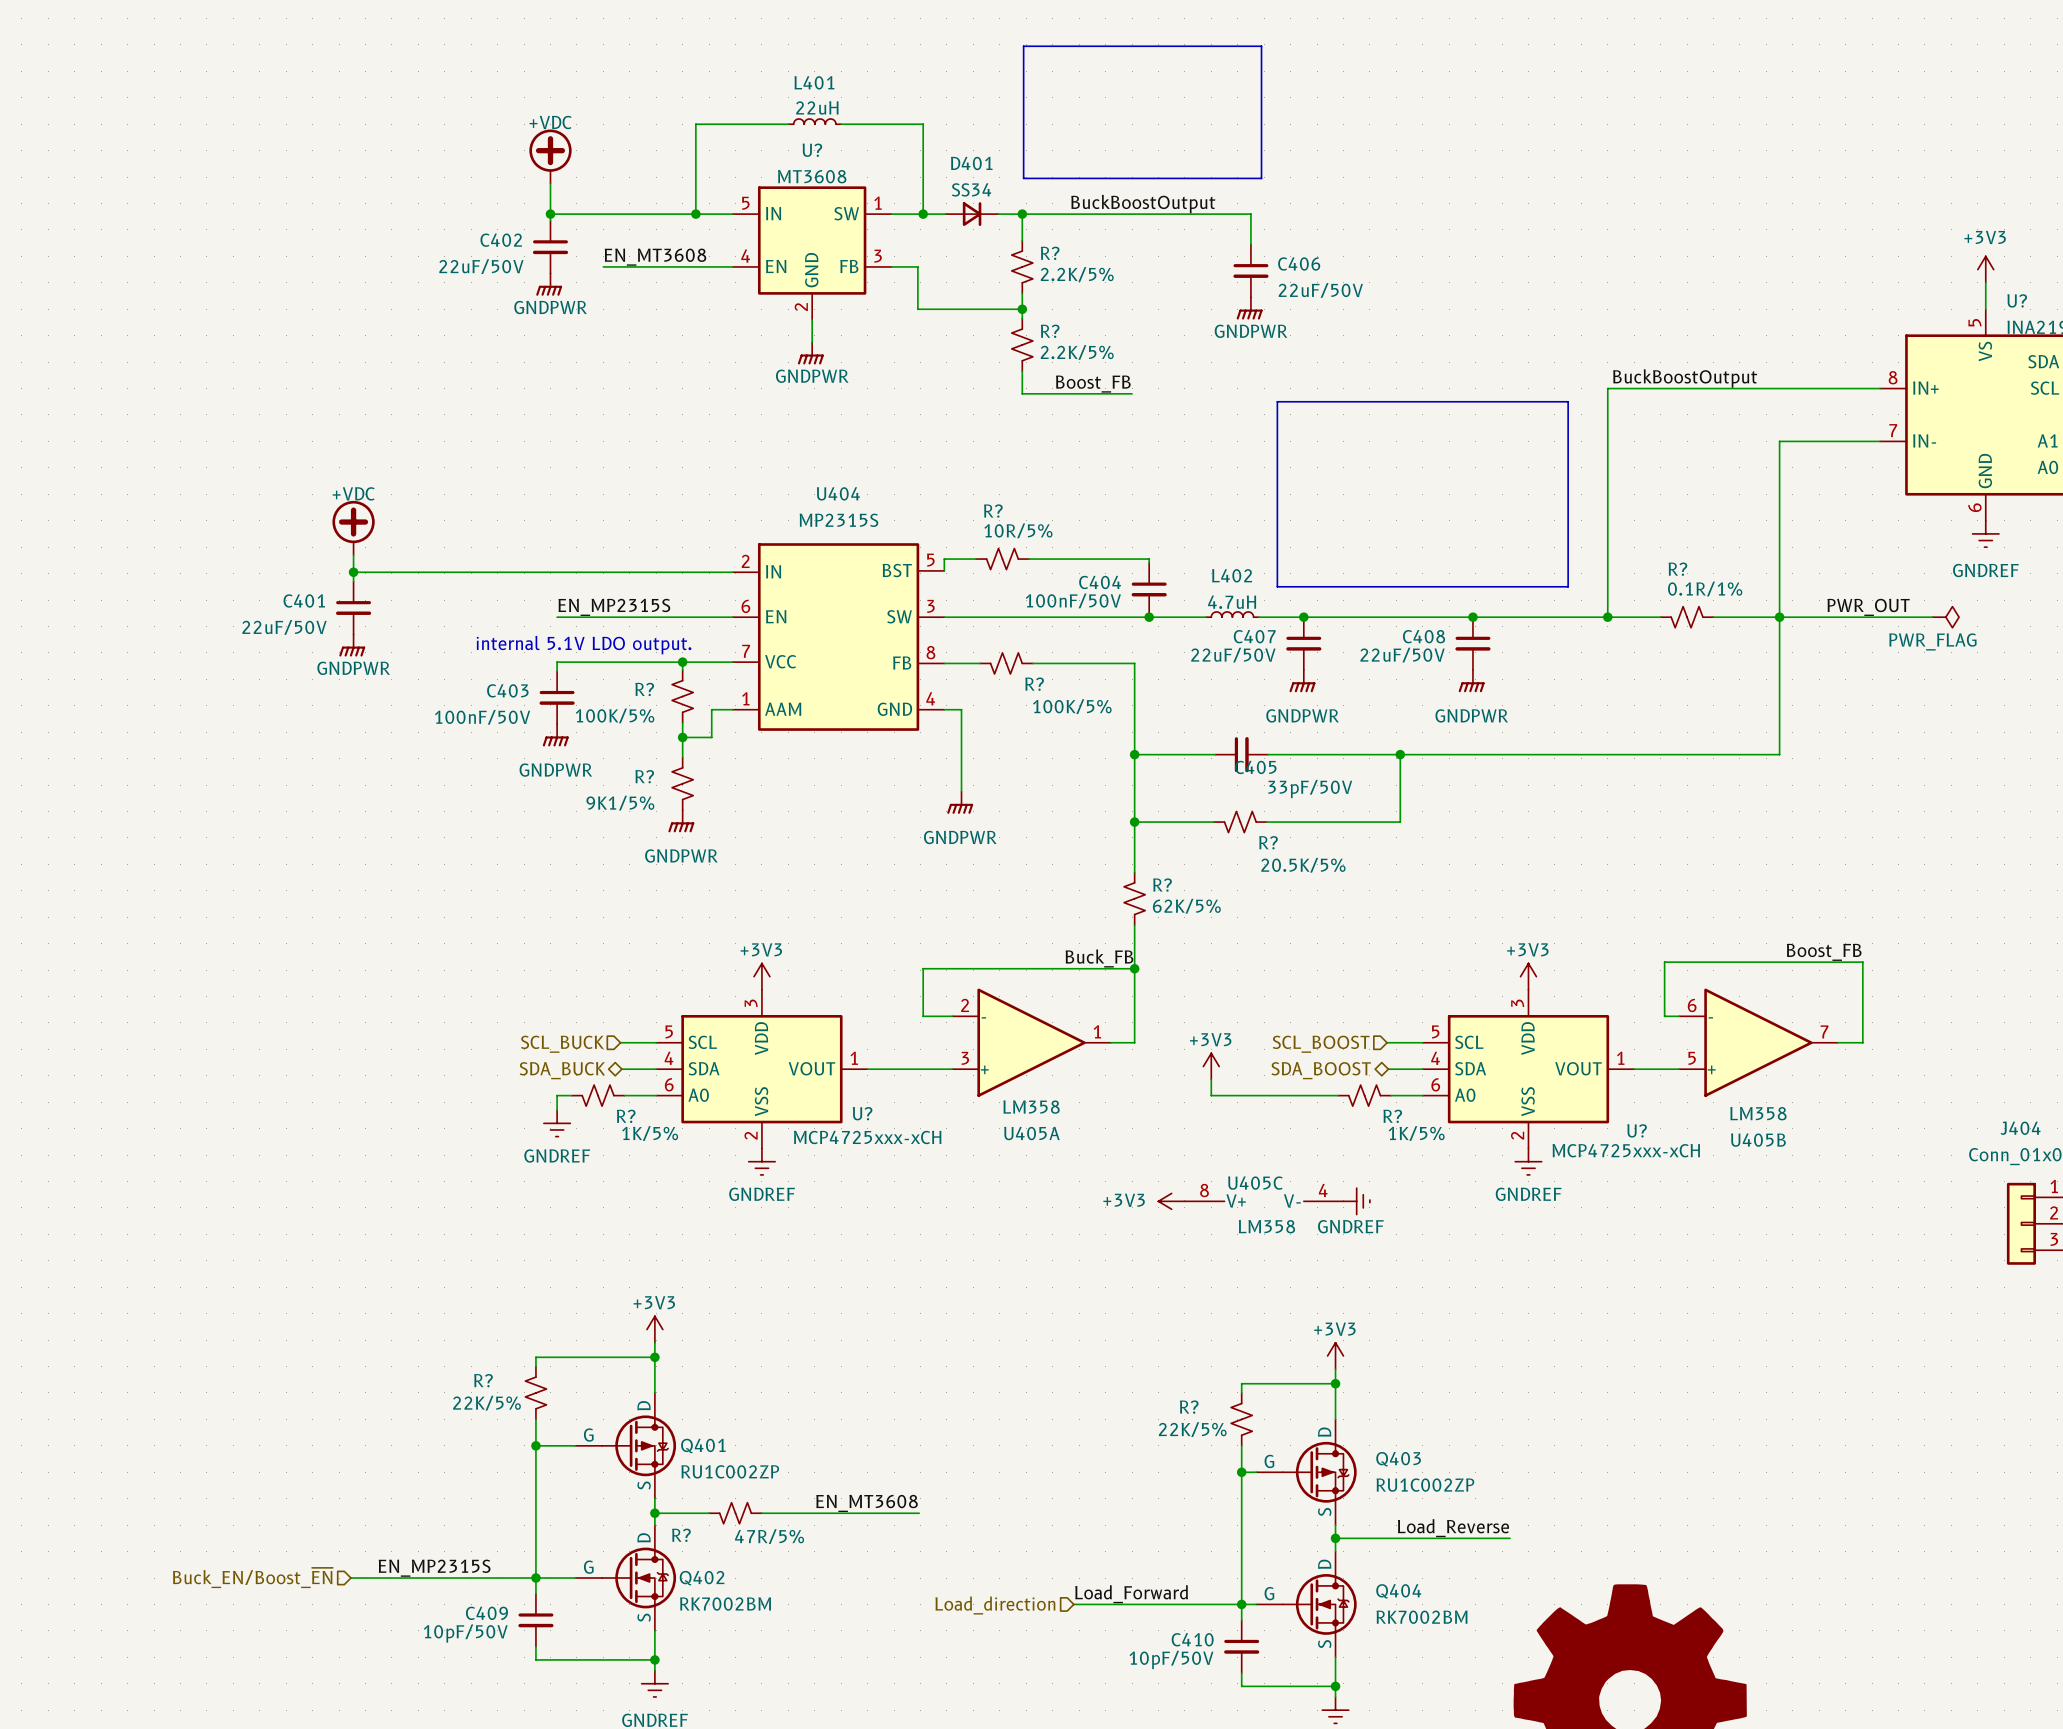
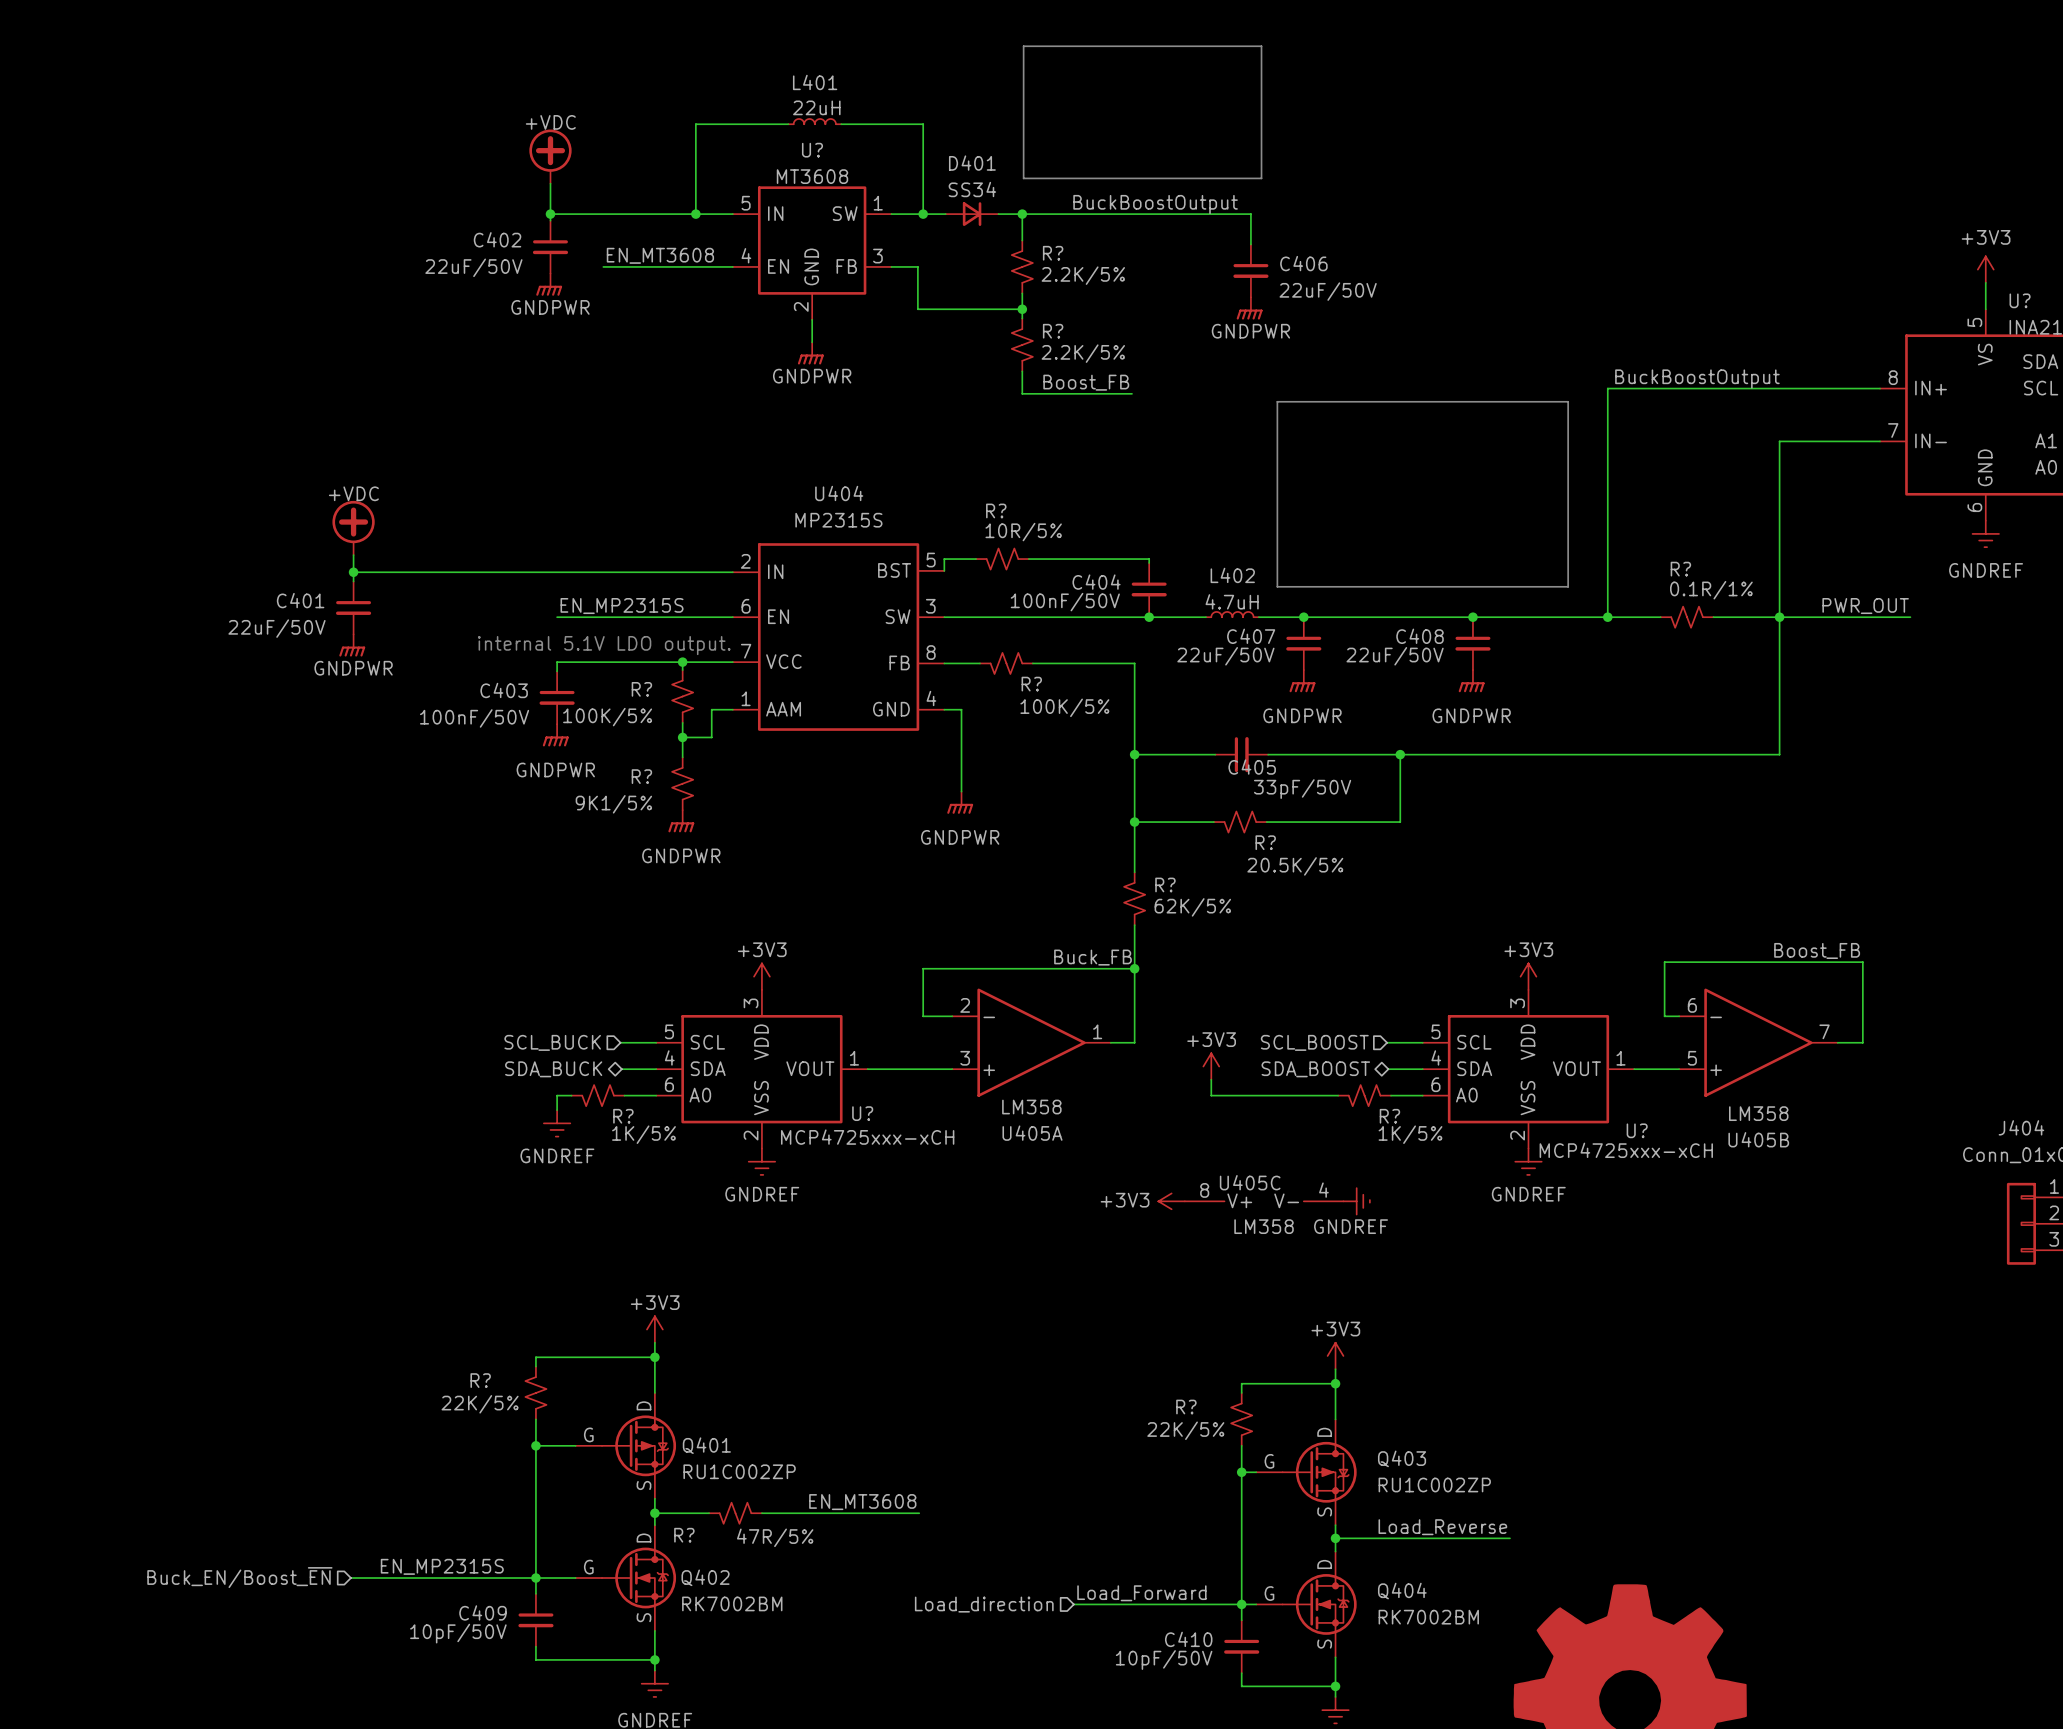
wire: (1910, 617) (1932, 617) -> none
power symbol: PWR_FLAG (1945, 617) -> none

